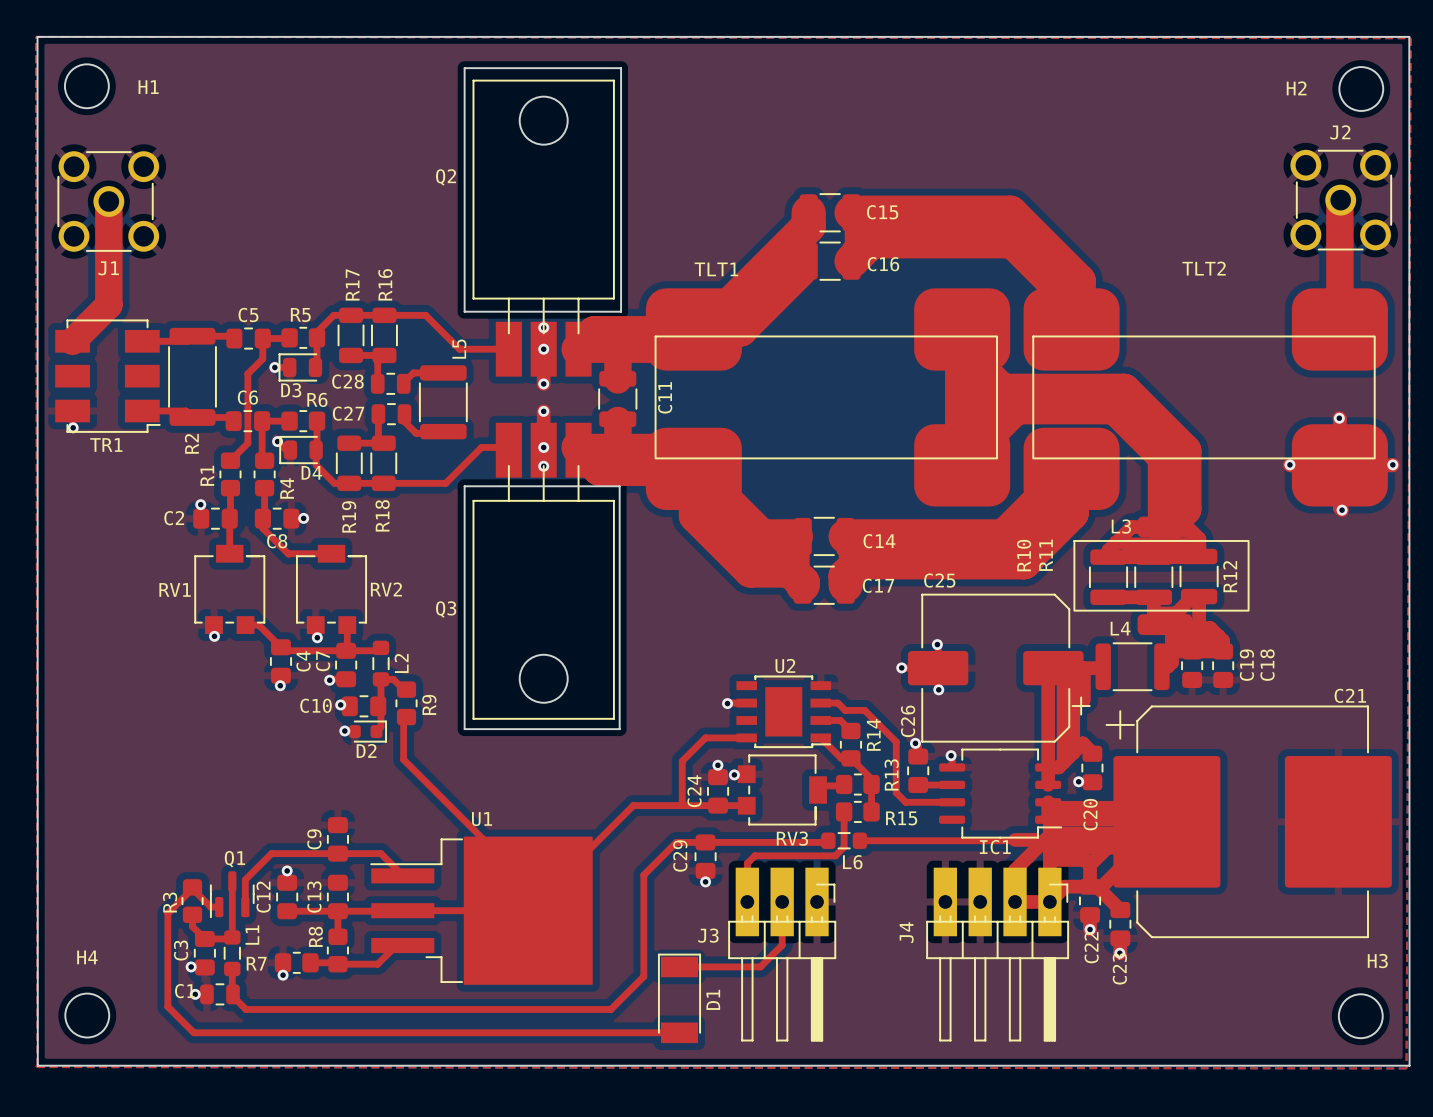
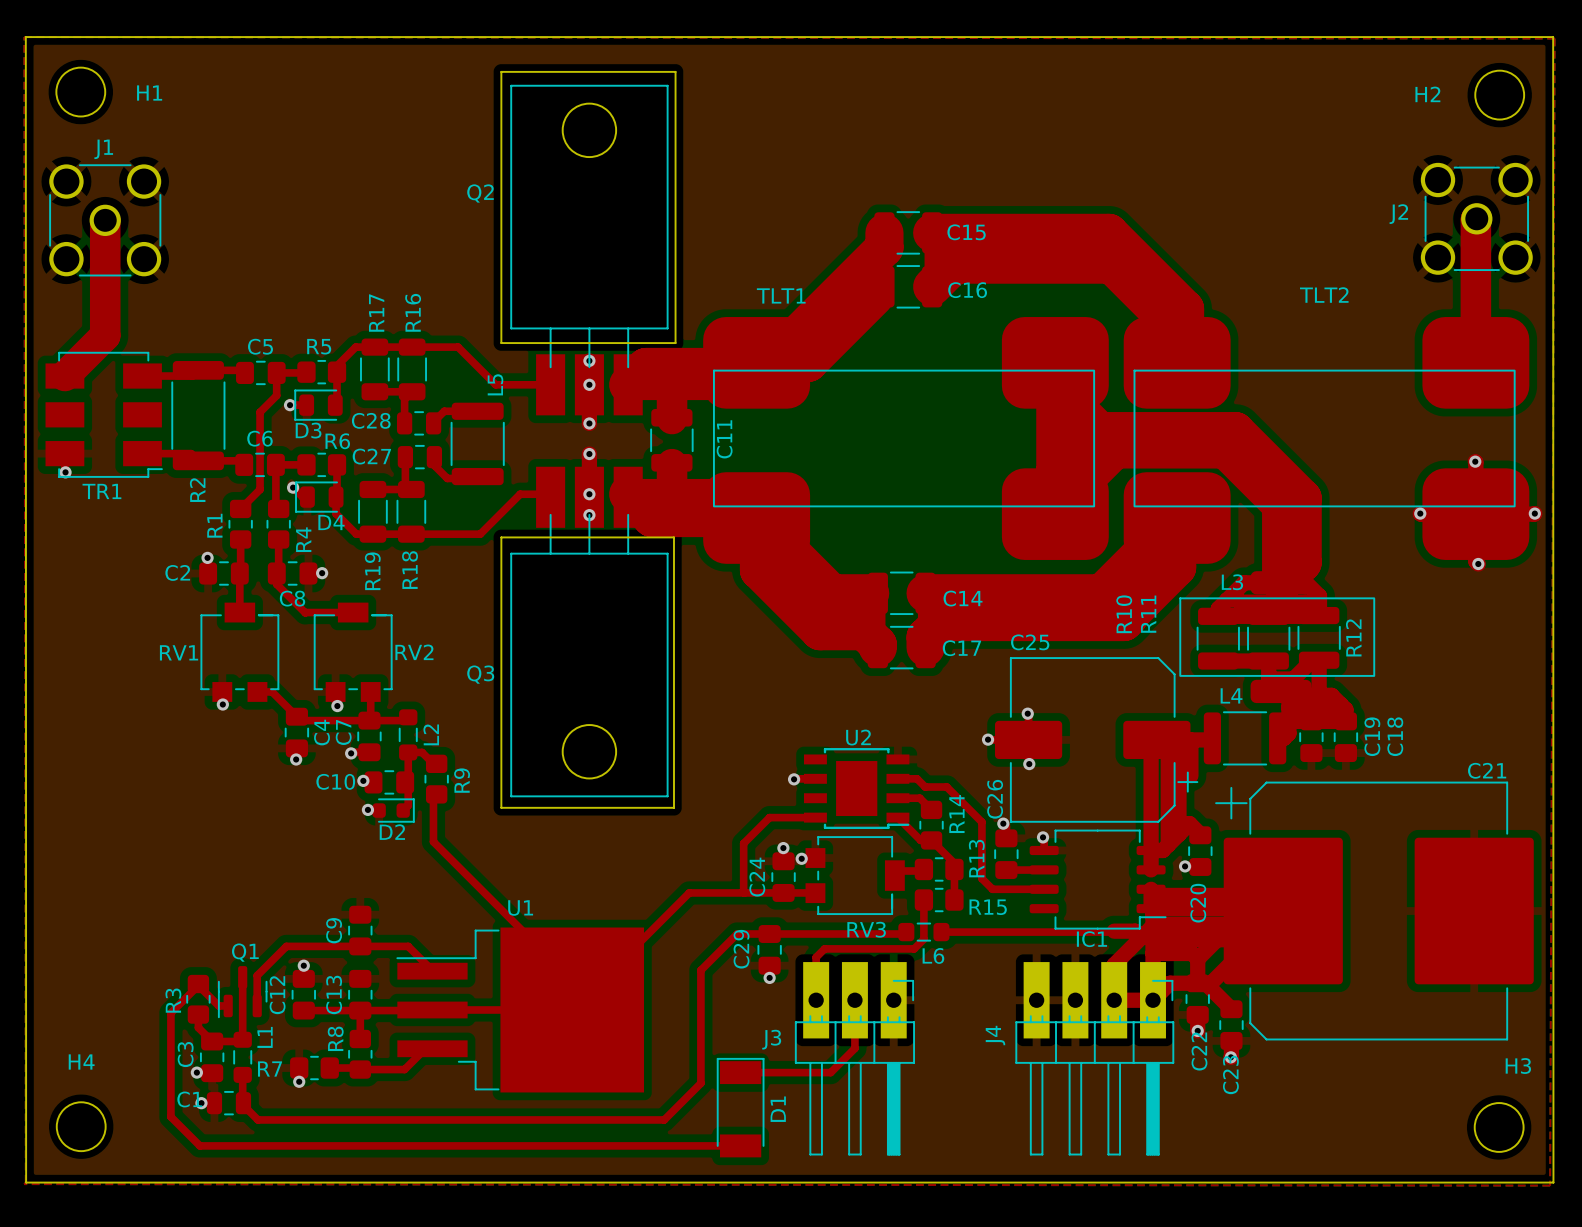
J2 name position: J2 (1340, 132) -> J2 (1398, 214)
J2 footprint: [1290, 149, 1393, 251] -> [1420, 162, 1533, 275]
J1 footprint: [57, 151, 160, 252] -> [49, 164, 162, 277]
J1 name position: J1 (108, 268) -> J1 (103, 149)

